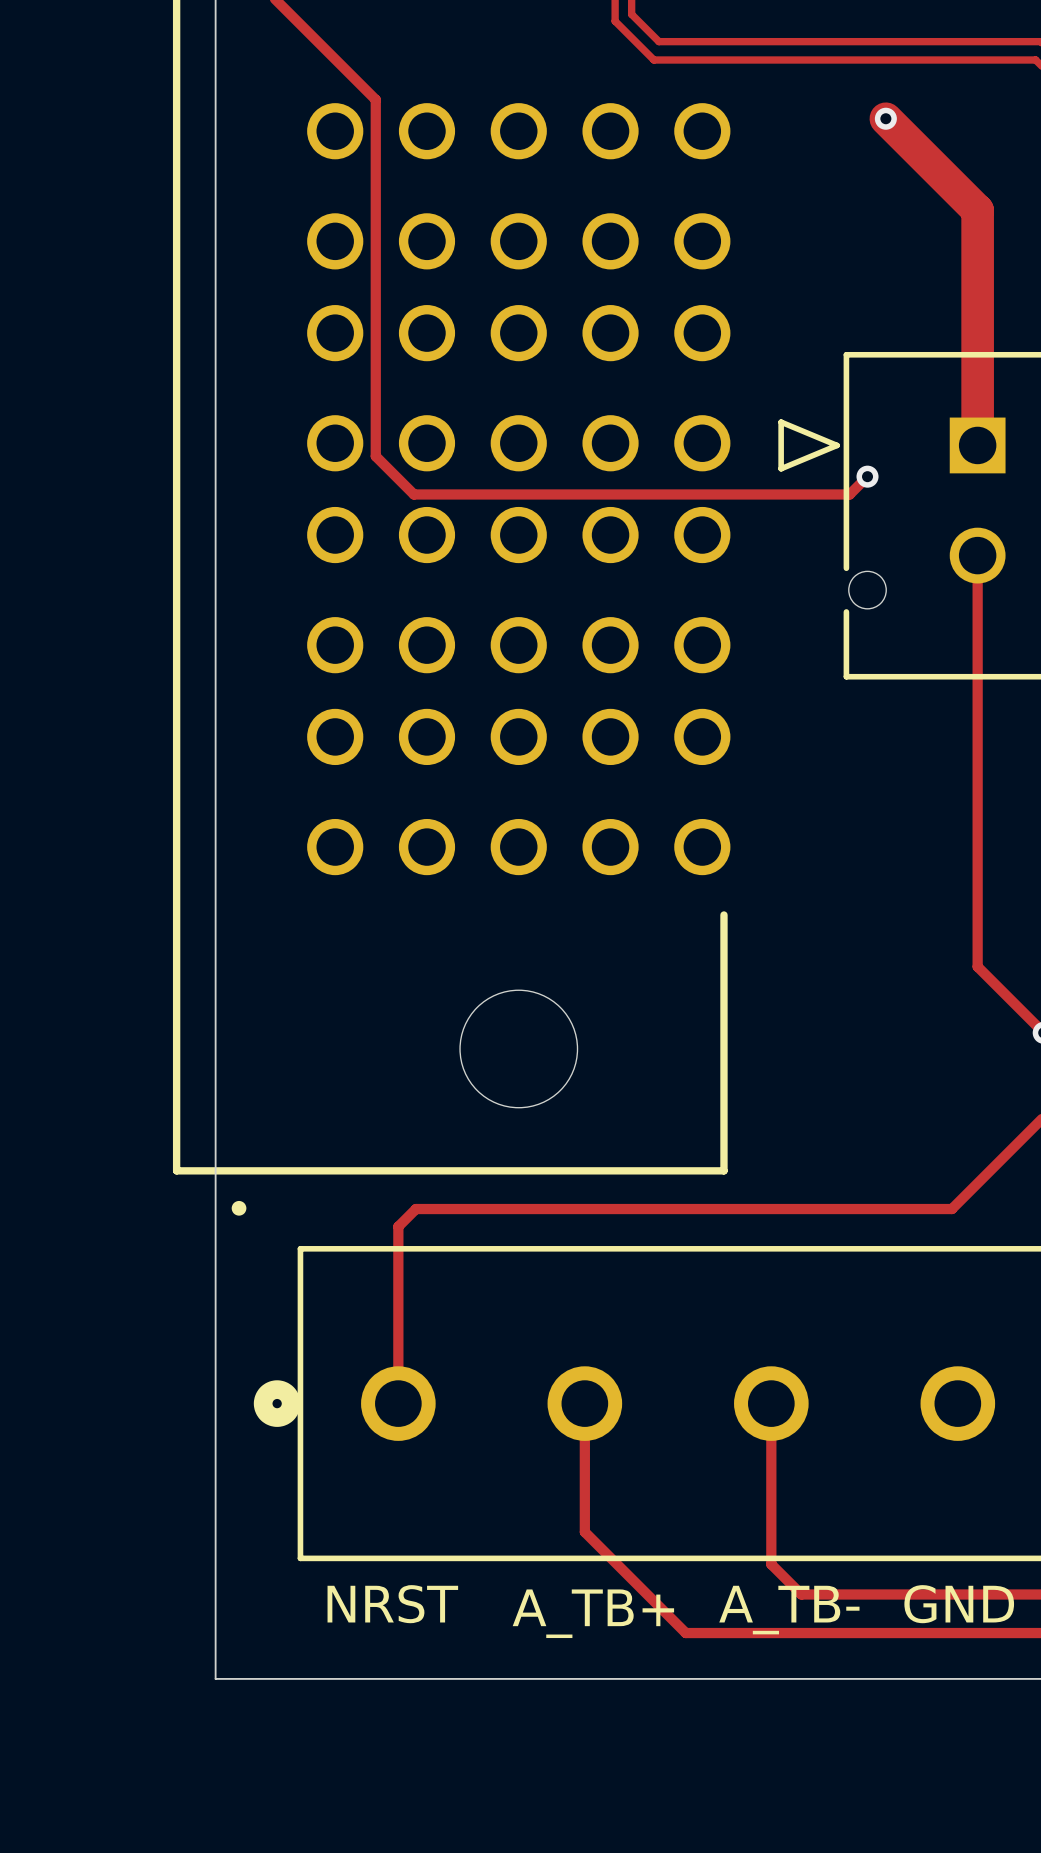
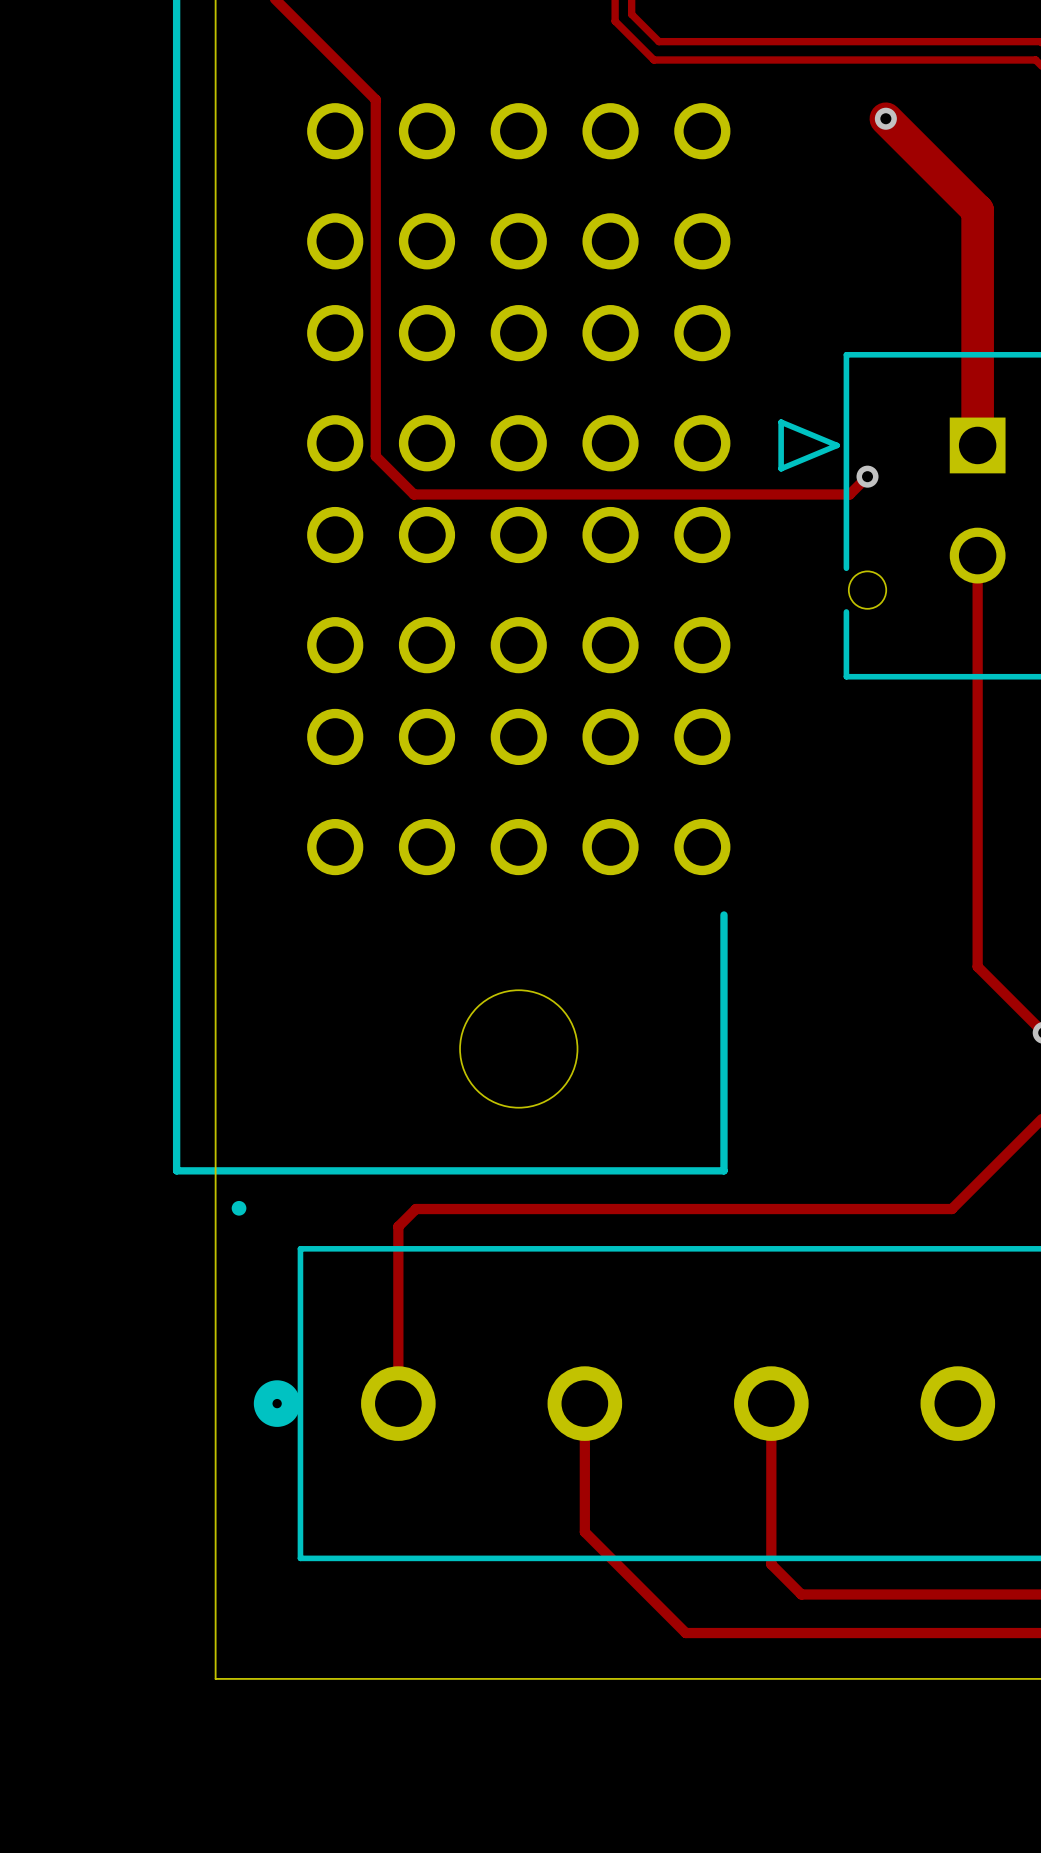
text: NRST (392, 1604) -> none
text: GND (959, 1604) -> none
text: A_TB- (789, 1610) -> none
text: A_TB+ (593, 1613) -> none

